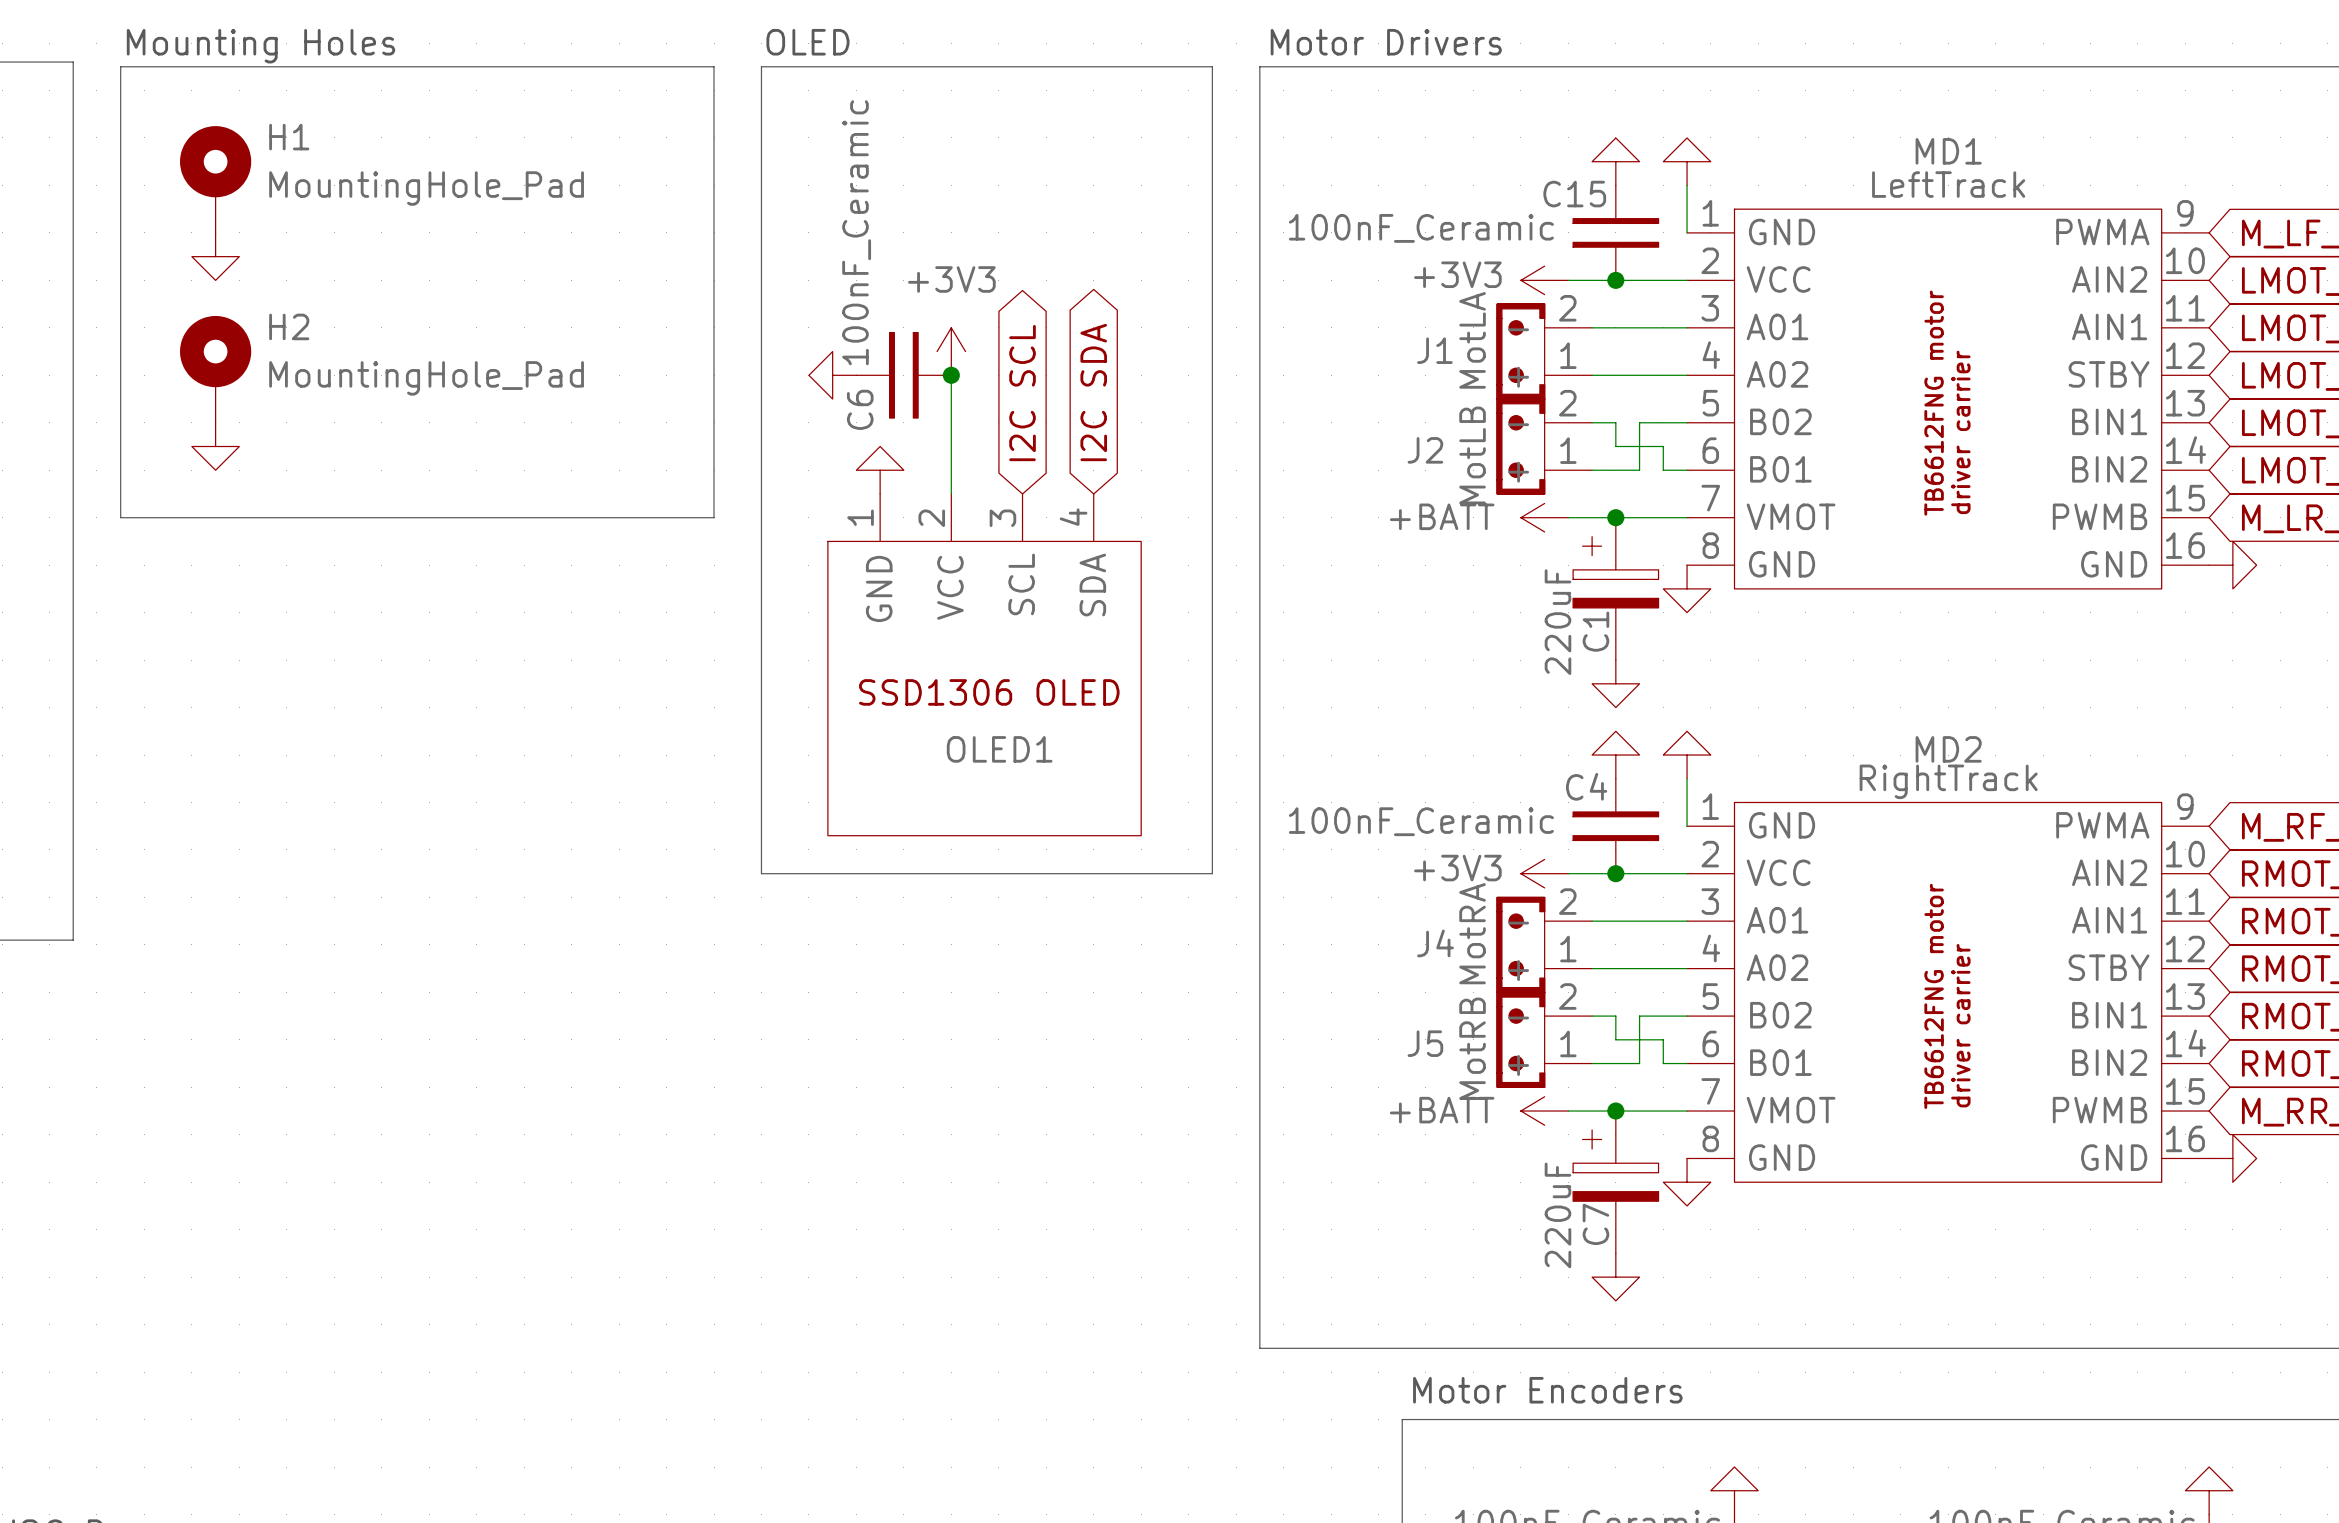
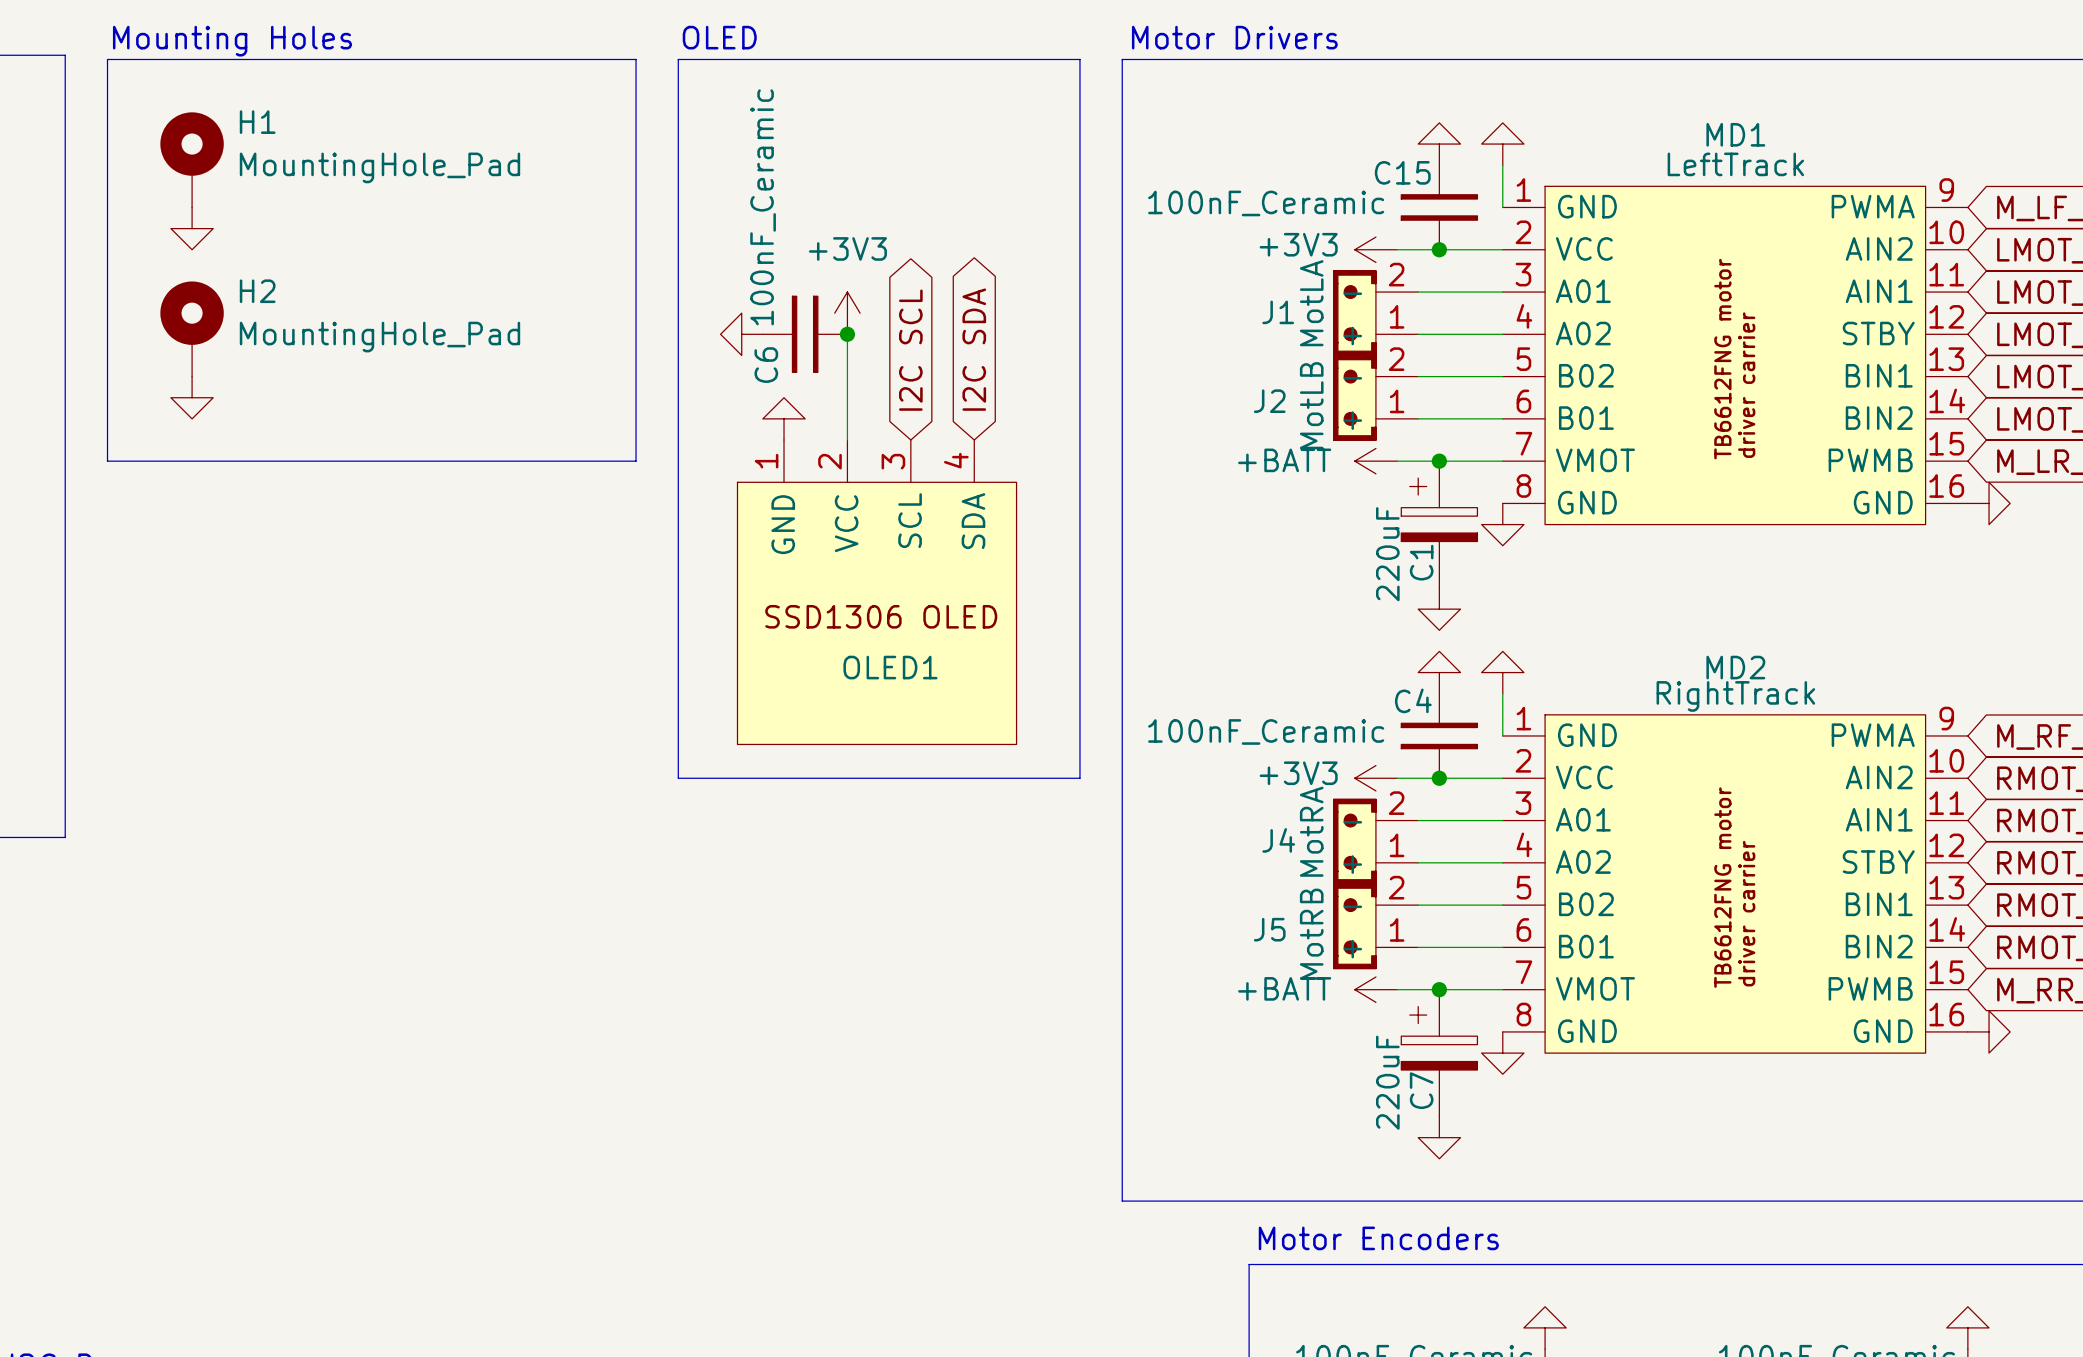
wire: (1615, 422) (1615, 446) (1663, 446) (1663, 470) -> (1460, 418) (1481, 418)
wire: (1639, 422) (1639, 470) -> (1460, 376) (1439, 376)
wire: (1615, 1016) (1615, 1039) (1663, 1039) (1663, 1063) -> (1460, 947) (1481, 947)
wire: (1639, 1016) (1639, 1063) -> (1460, 905) (1439, 905)

